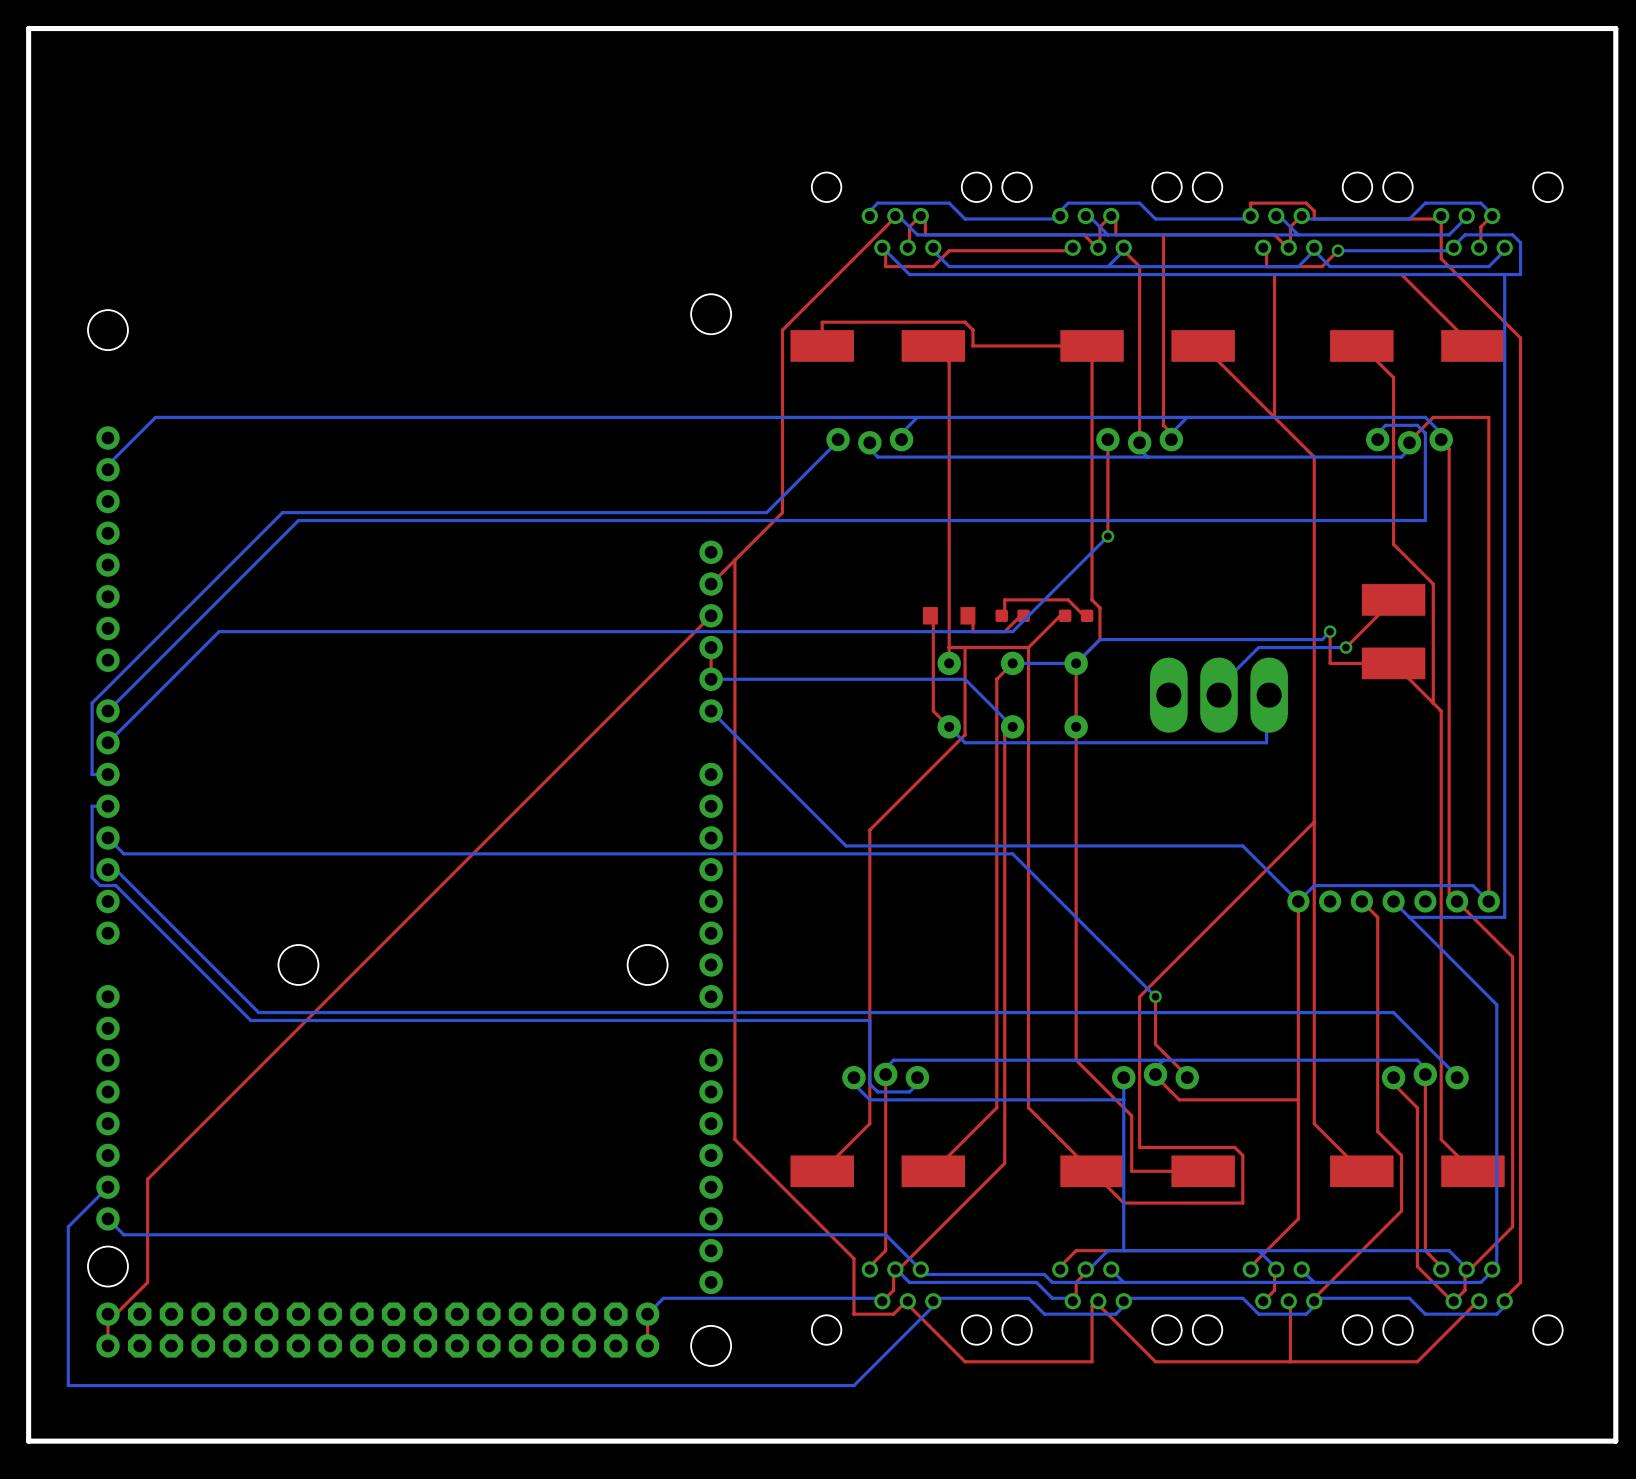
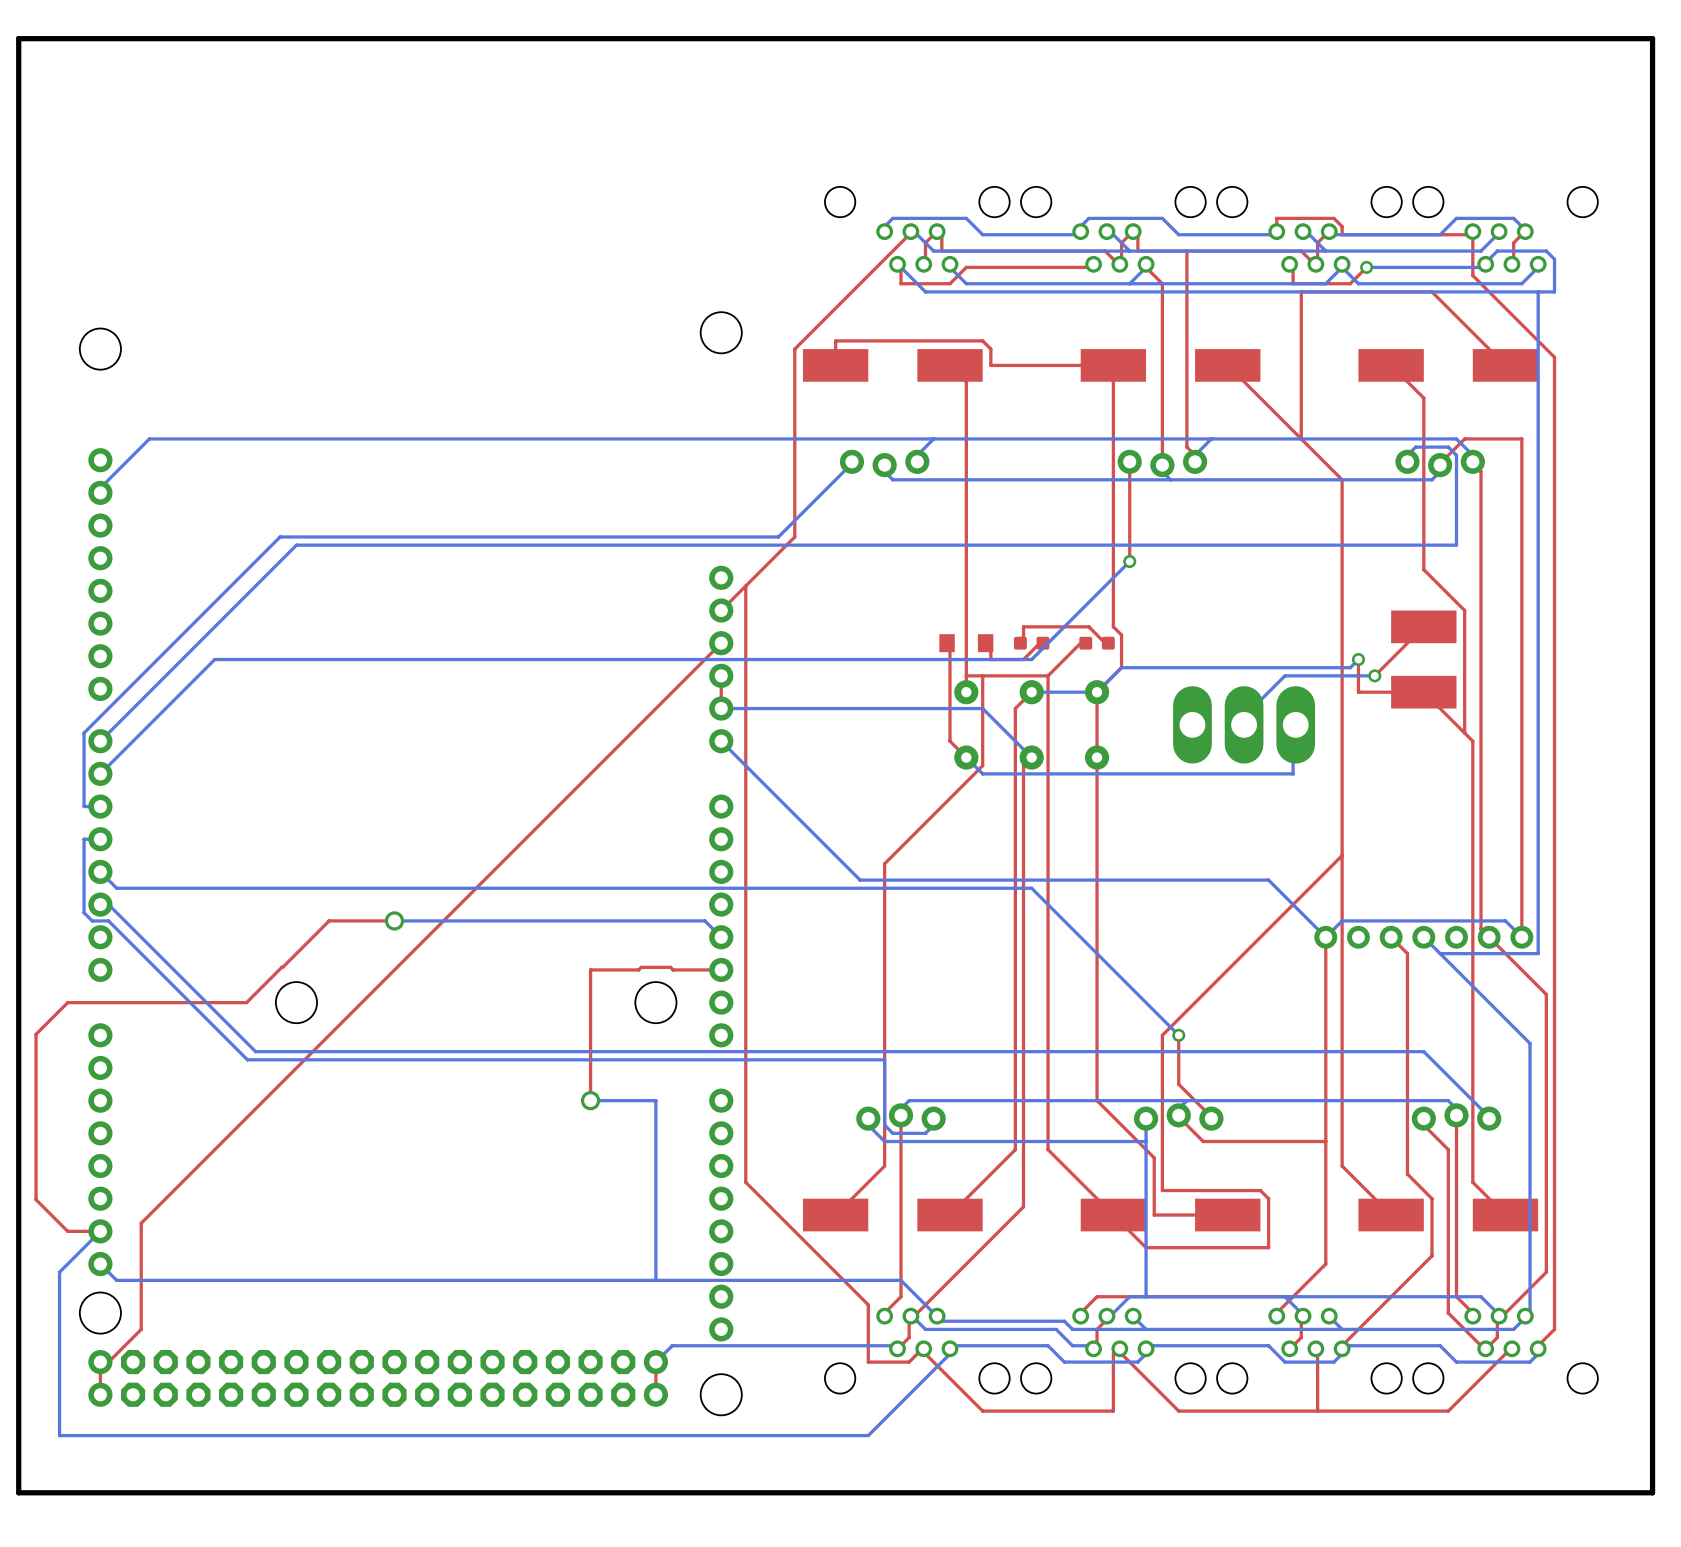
top track: none -> (394, 920) (329, 920) (246, 1002) (67, 1002) (36, 1034) (36, 1199) (67, 1231) (100, 1231)
bottom track: none -> (394, 920) (704, 920) (721, 937)
via: none -> (394, 920)
top track: none -> (721, 969) (673, 969) (670, 967) (641, 967) (638, 969) (590, 969) (590, 1100)
bottom track: none -> (590, 1100) (655, 1100) (655, 1280)
via: none -> (590, 1100)

